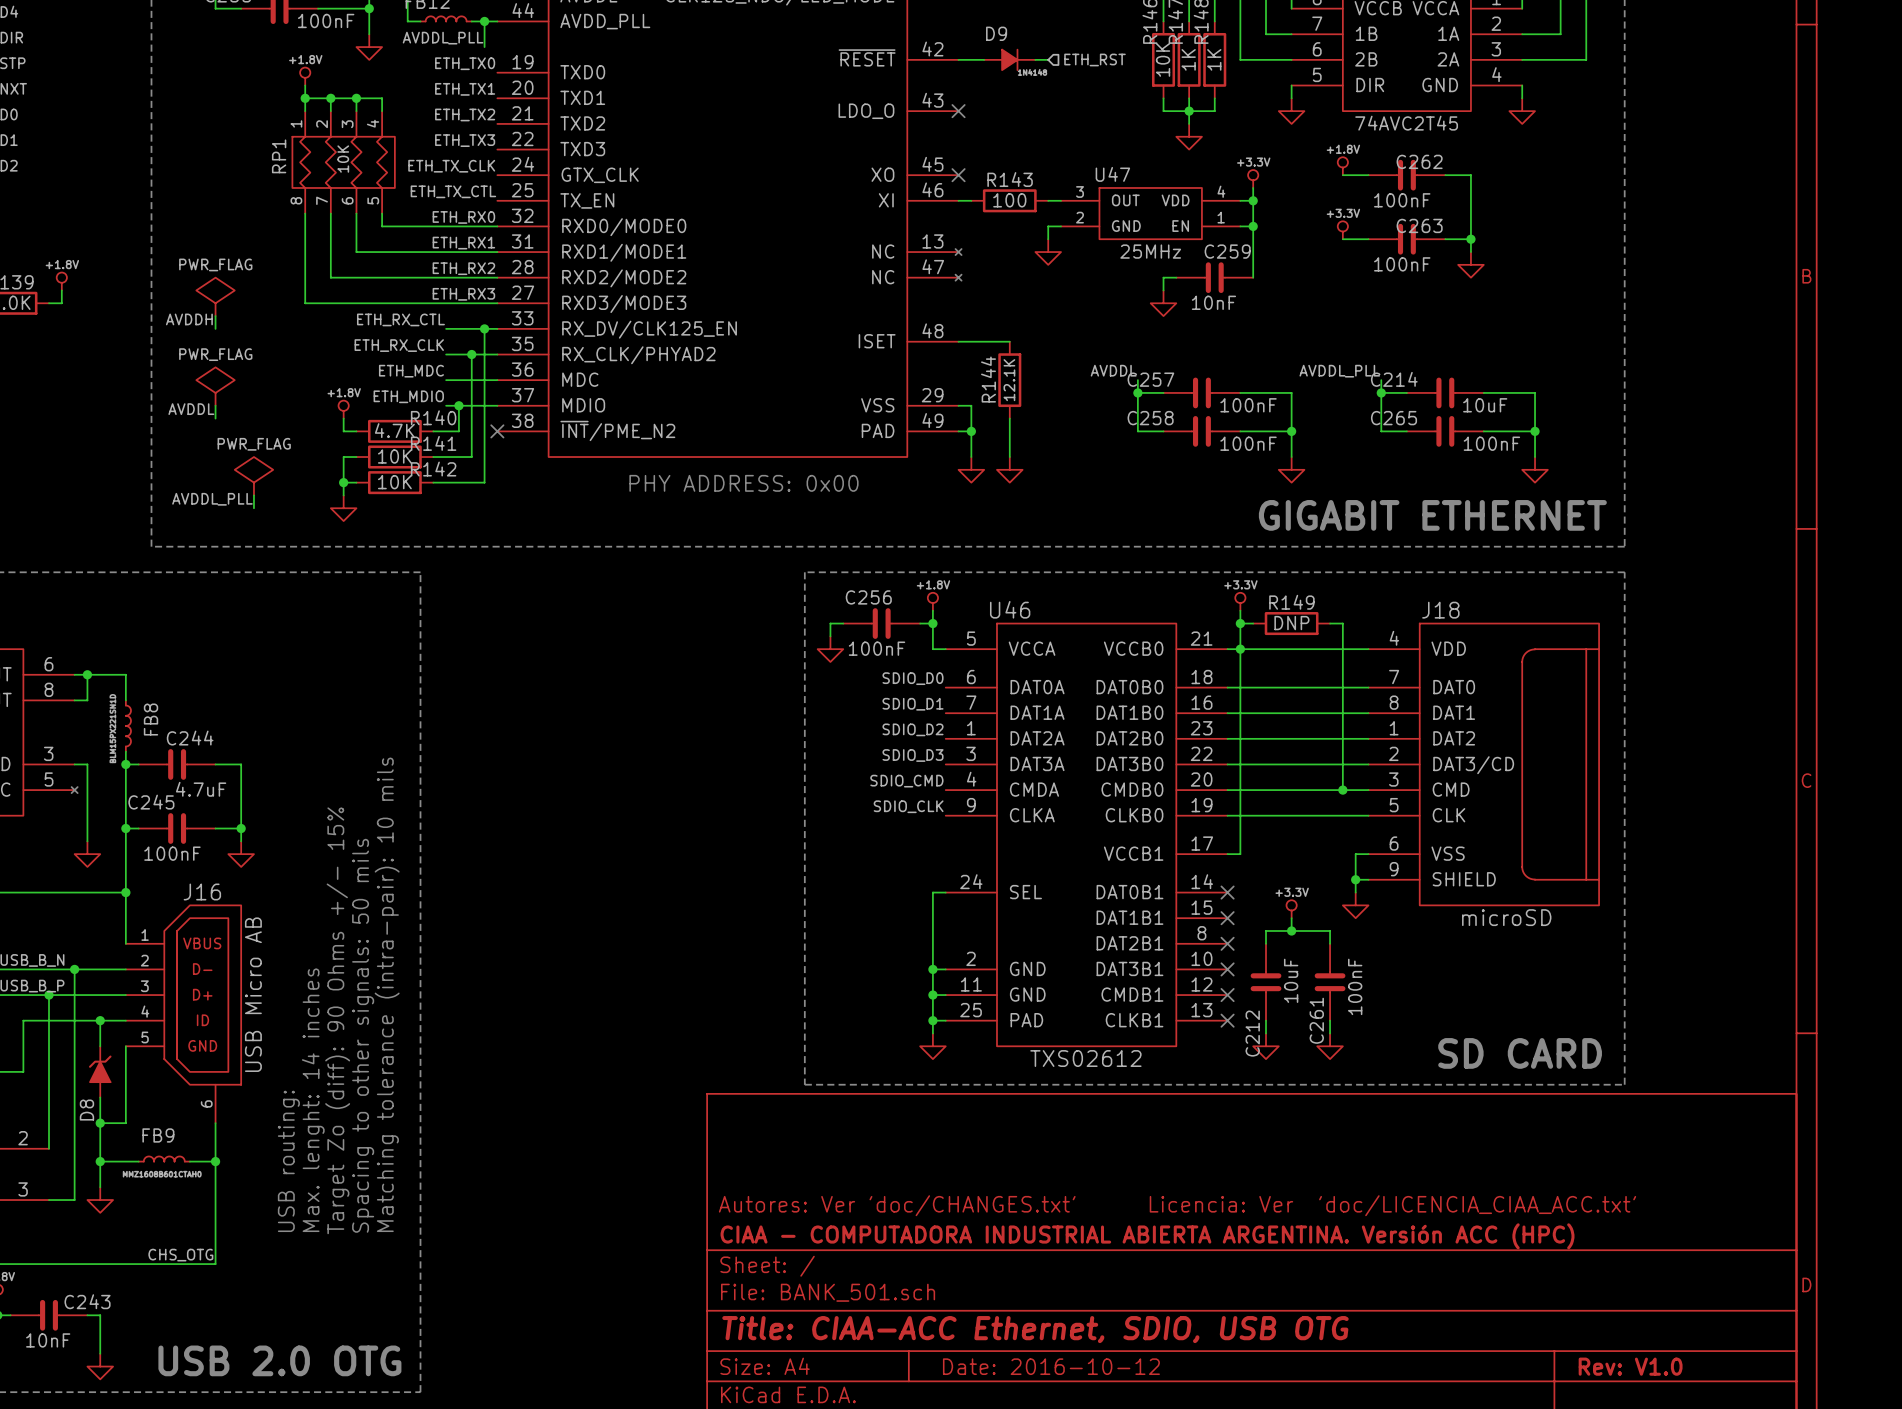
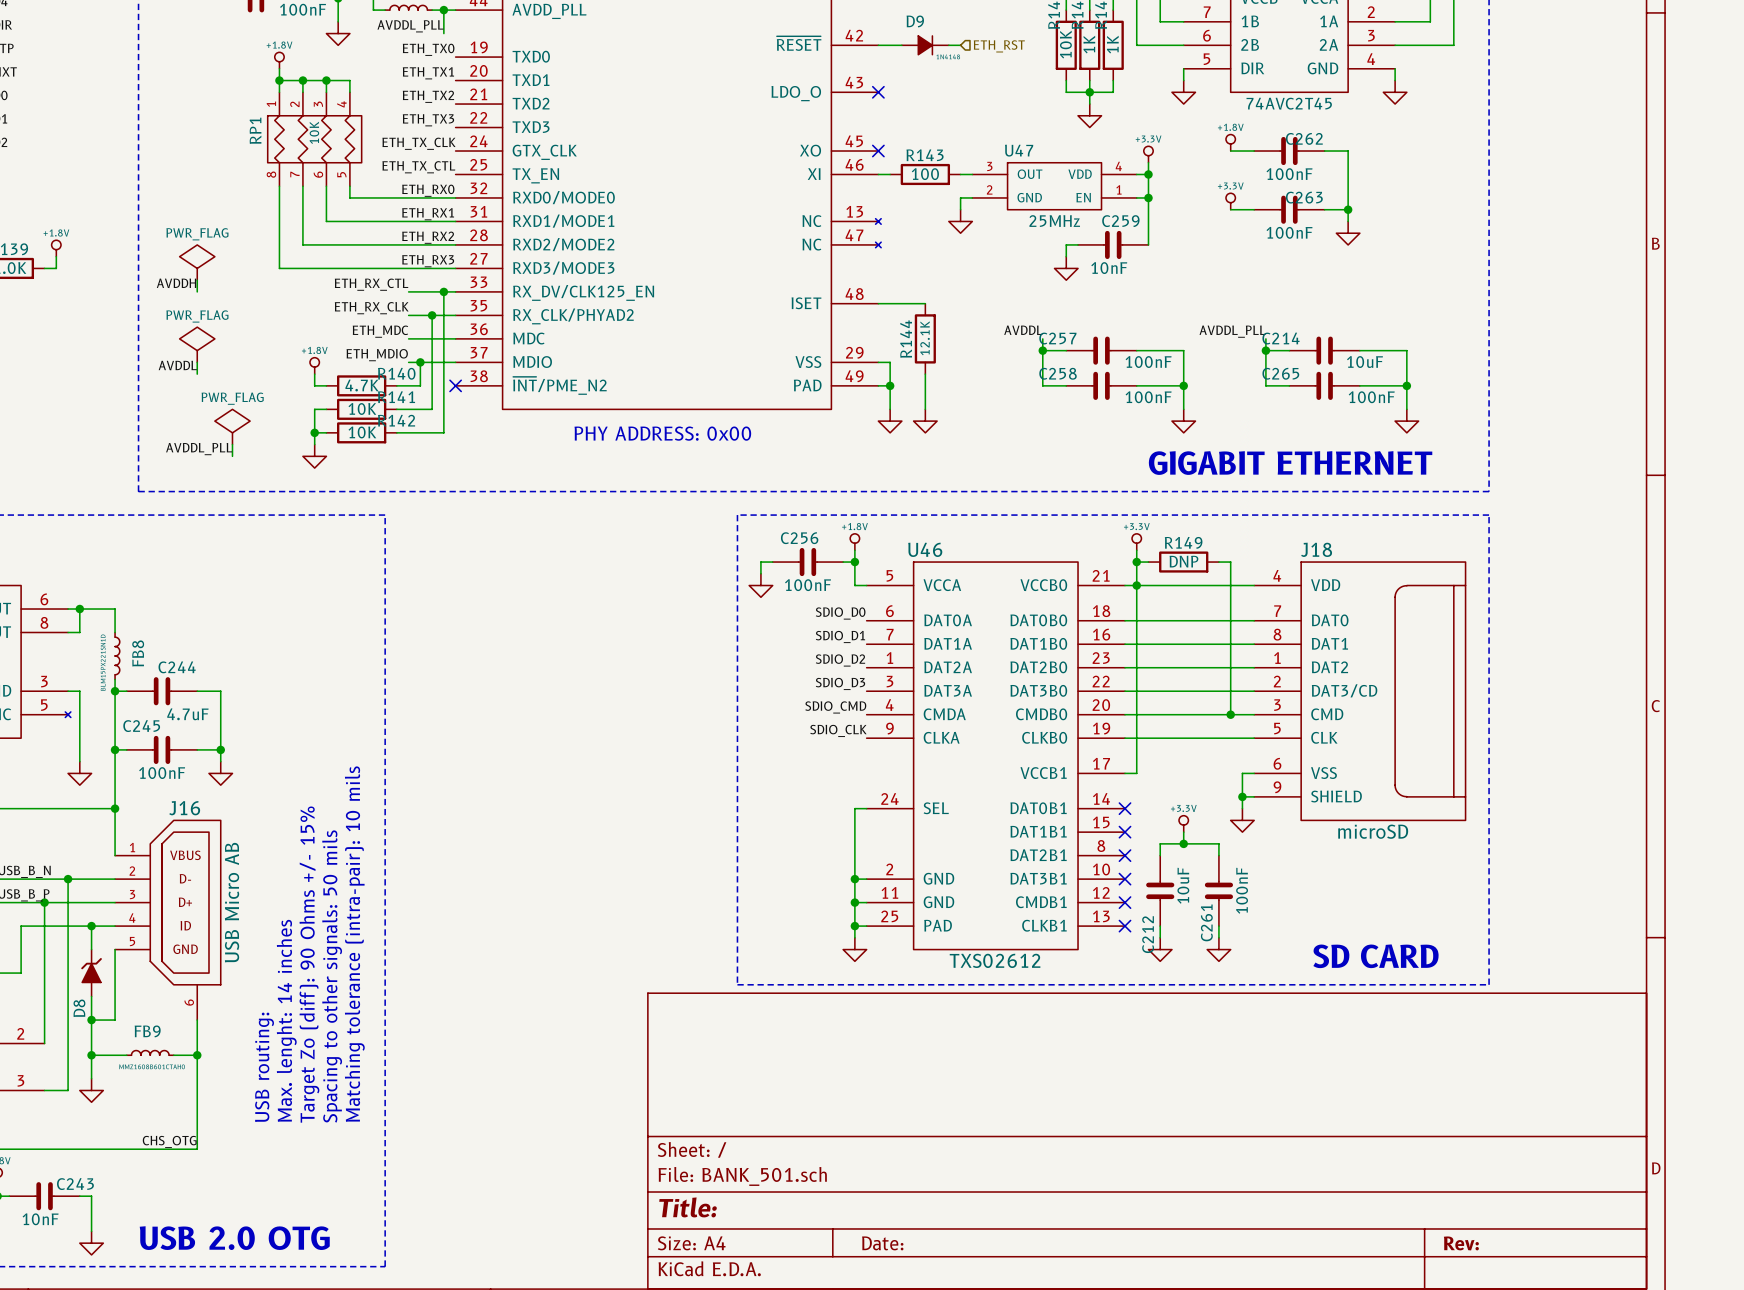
title block: Autores: Ver 'doc/CHANGES.txt' Licencia: Ver 'doc/LICENCIA_CIAA_ACC.txt' (1177, 1205) -> none
title block: CIAA - COMPUTADORA INDUSTRIAL ABIERTA ARGENTINA. Versión ACC (HPC) (1147, 1236) -> none
title block: Title: CIAA-ACC Ethernet, SDIO, USB OTG (1035, 1329) -> Title: (688, 1207)
title block: Date: 2016-10-12 (1051, 1366) -> Date: (882, 1243)
title block: Rev: V1.0 (1630, 1366) -> Rev: (1461, 1243)

